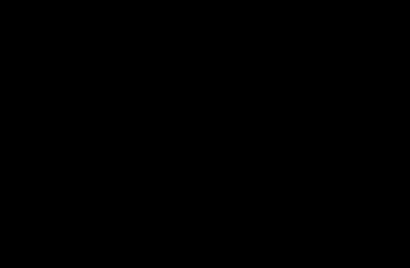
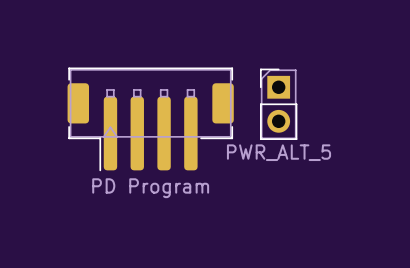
part: none -> PWR_ALT_5 (278, 104)
part: none -> PD Program (150, 119)

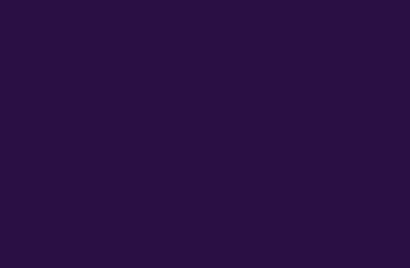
part: PWR_ALT_5 (278, 104) -> none
part: PD Program (150, 119) -> none

